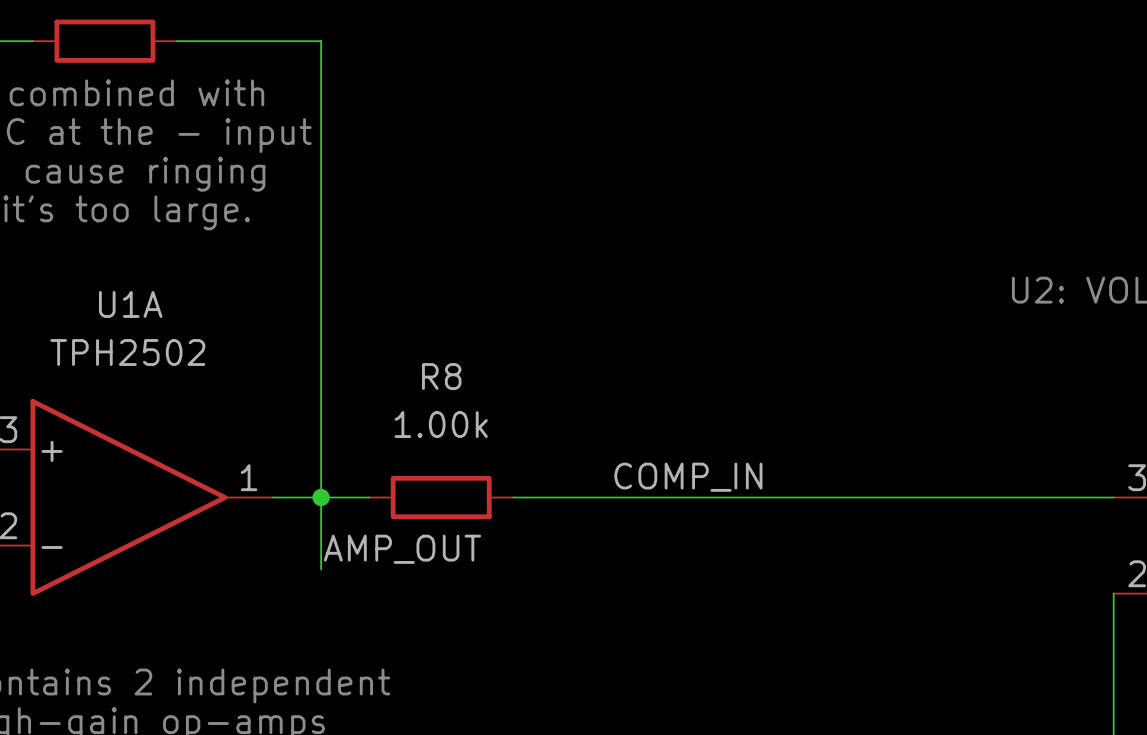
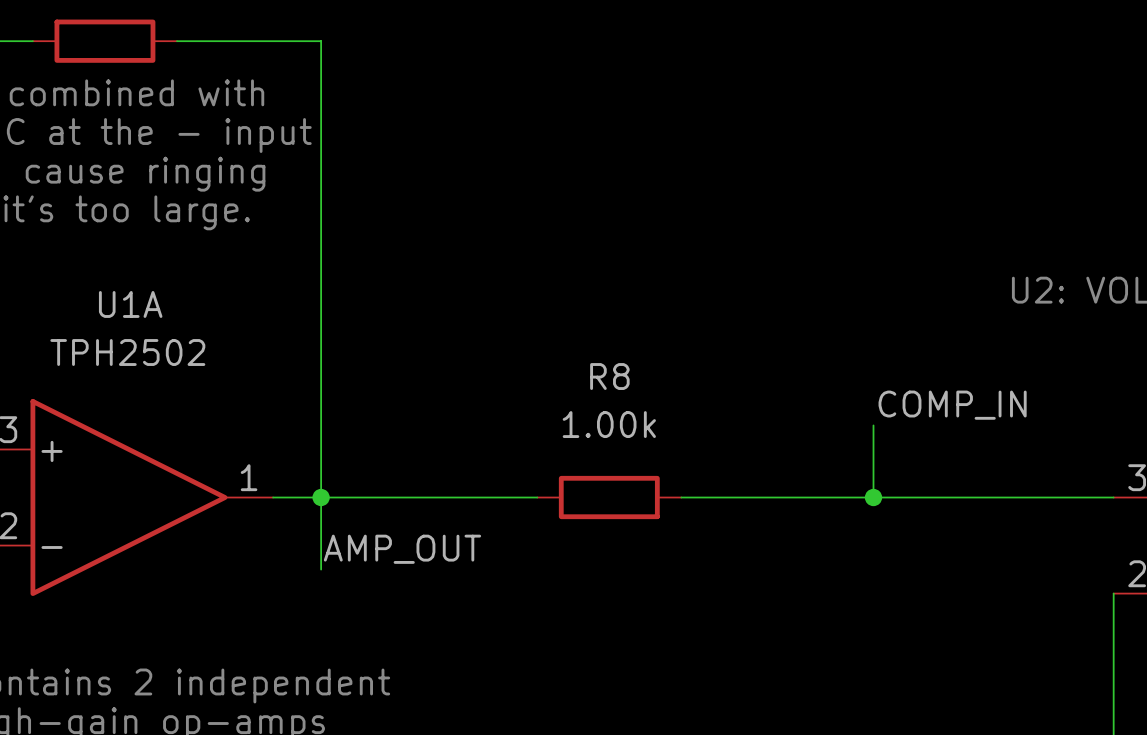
wire: none -> (873, 425) (873, 497)
label position: COMP_IN (688, 477) -> COMP_IN (952, 405)
R8 position: (441, 497) -> (609, 497)
wire: (537, 497) (681, 497) -> (369, 497) (513, 497)
junction: none -> (873, 497)

